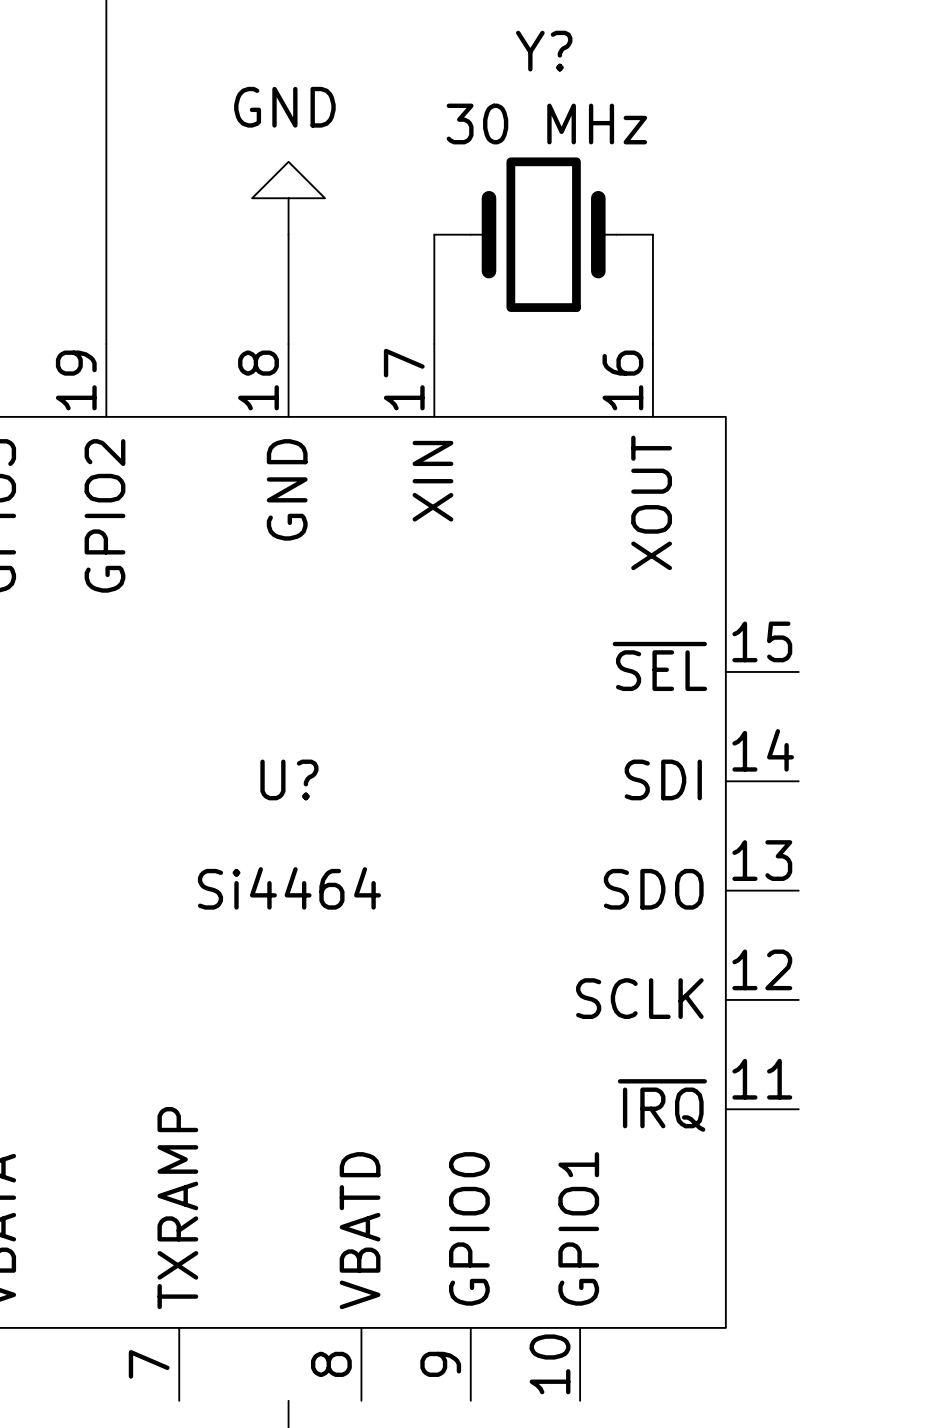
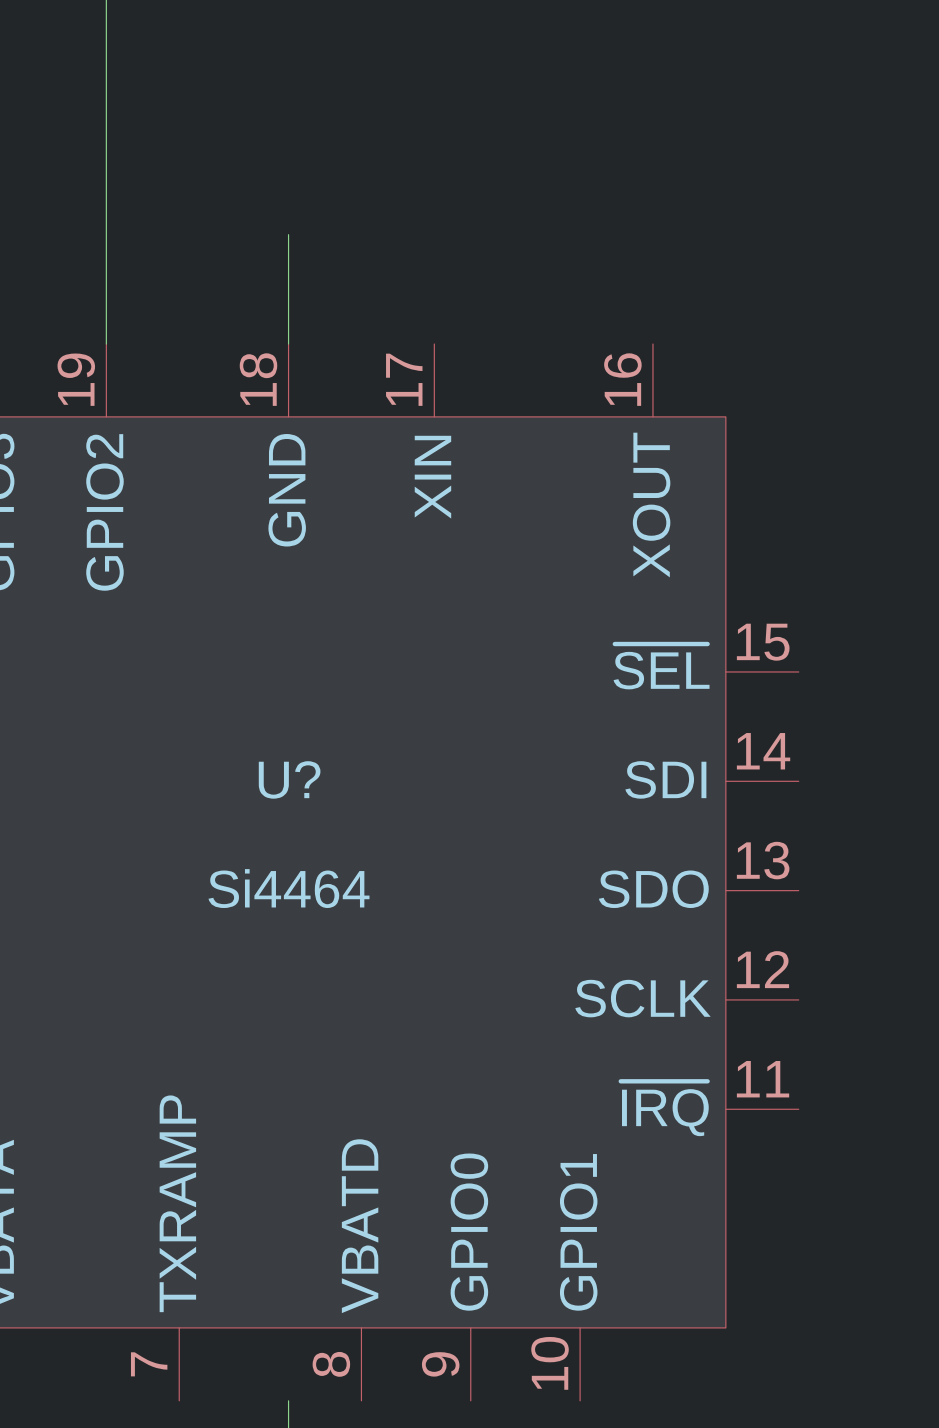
power symbol: GND (288, 198) -> none
wire: (434, 234) (434, 344) -> none
Y?: 30 MHz (543, 234) -> none
wire: (652, 234) (652, 344) -> none

